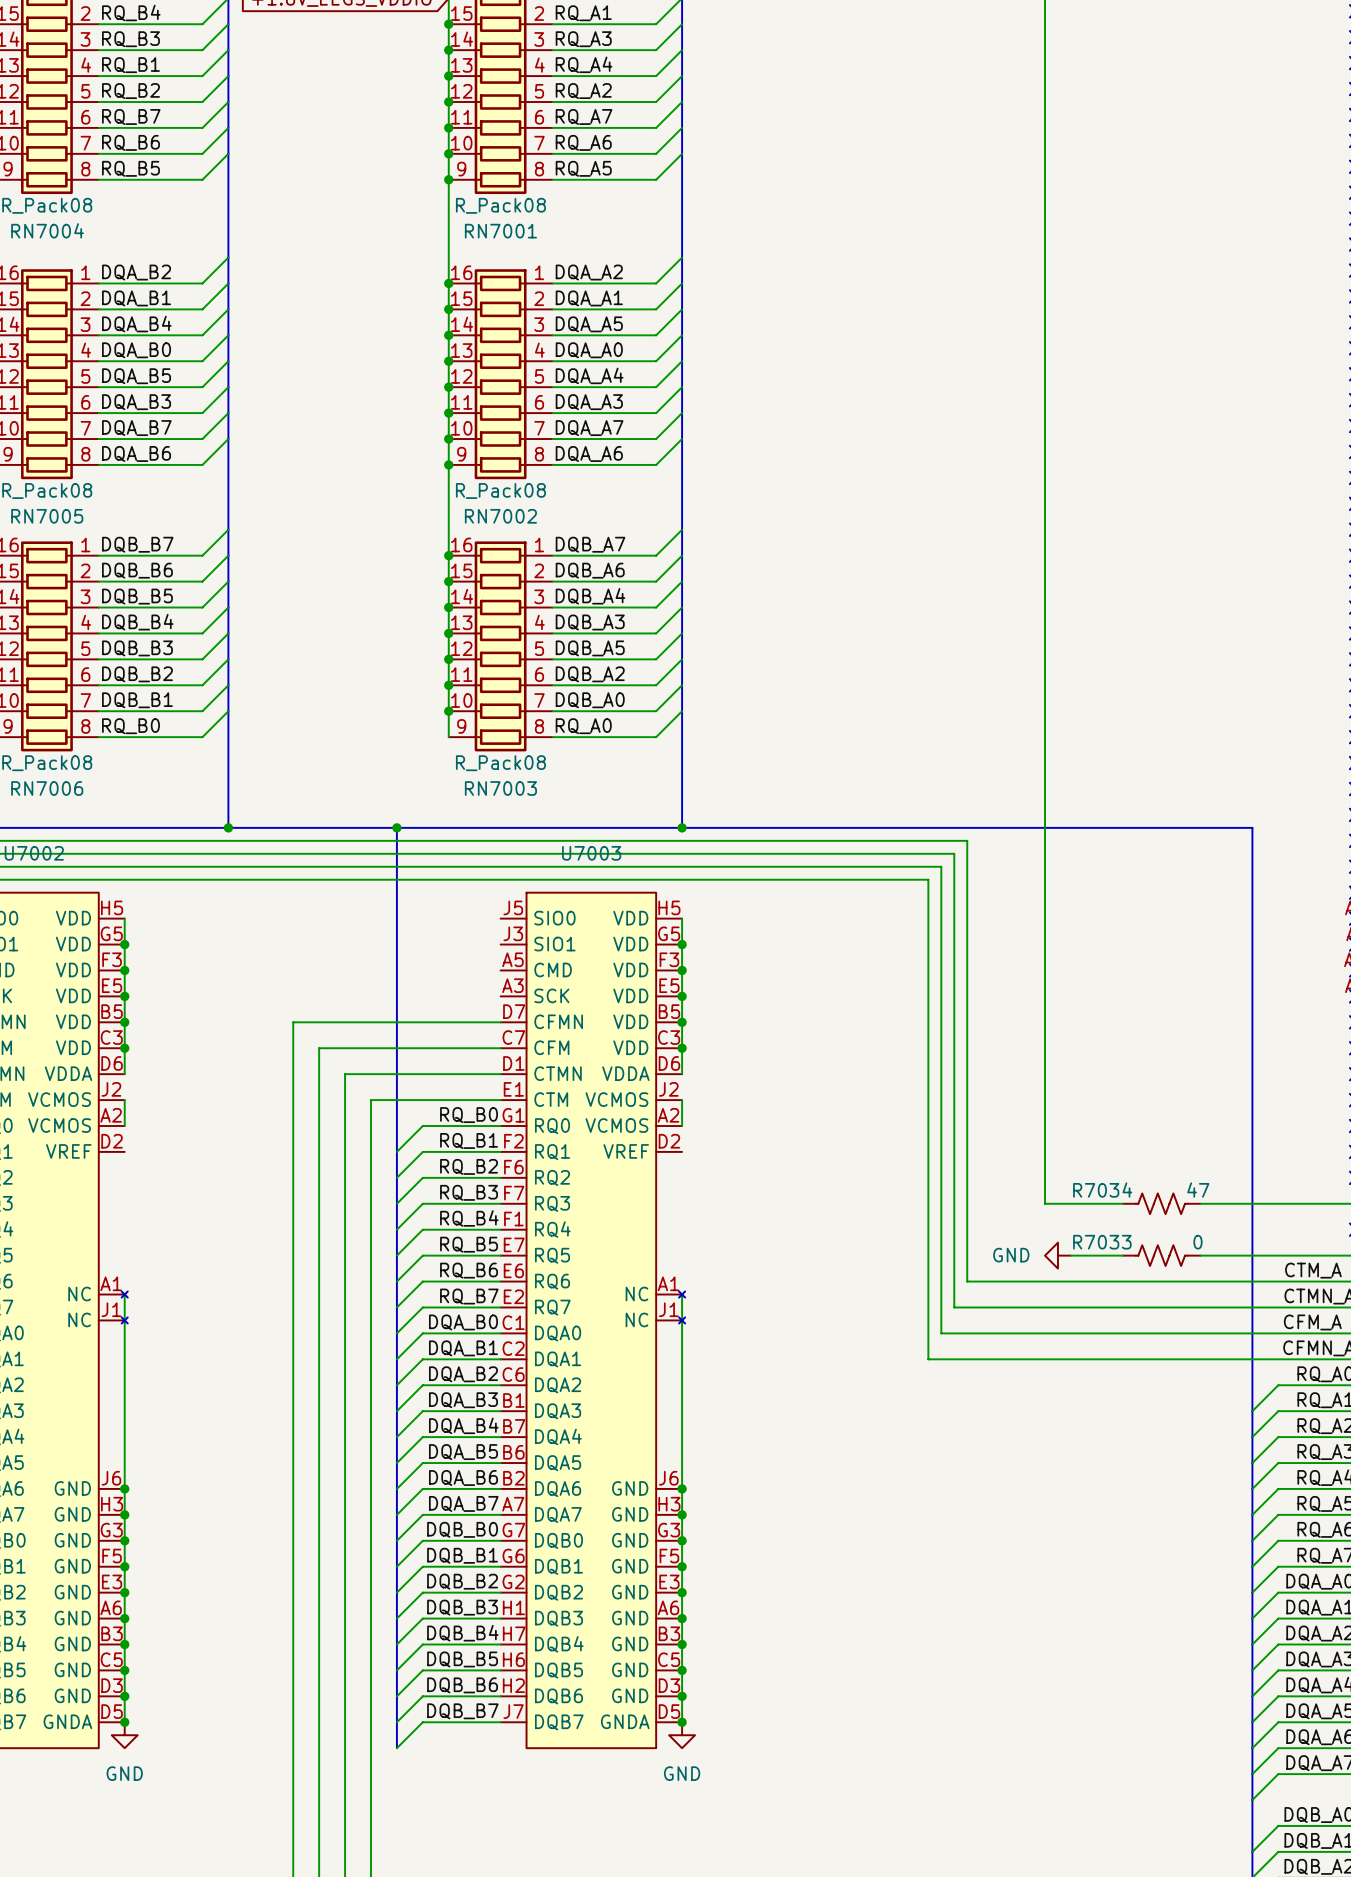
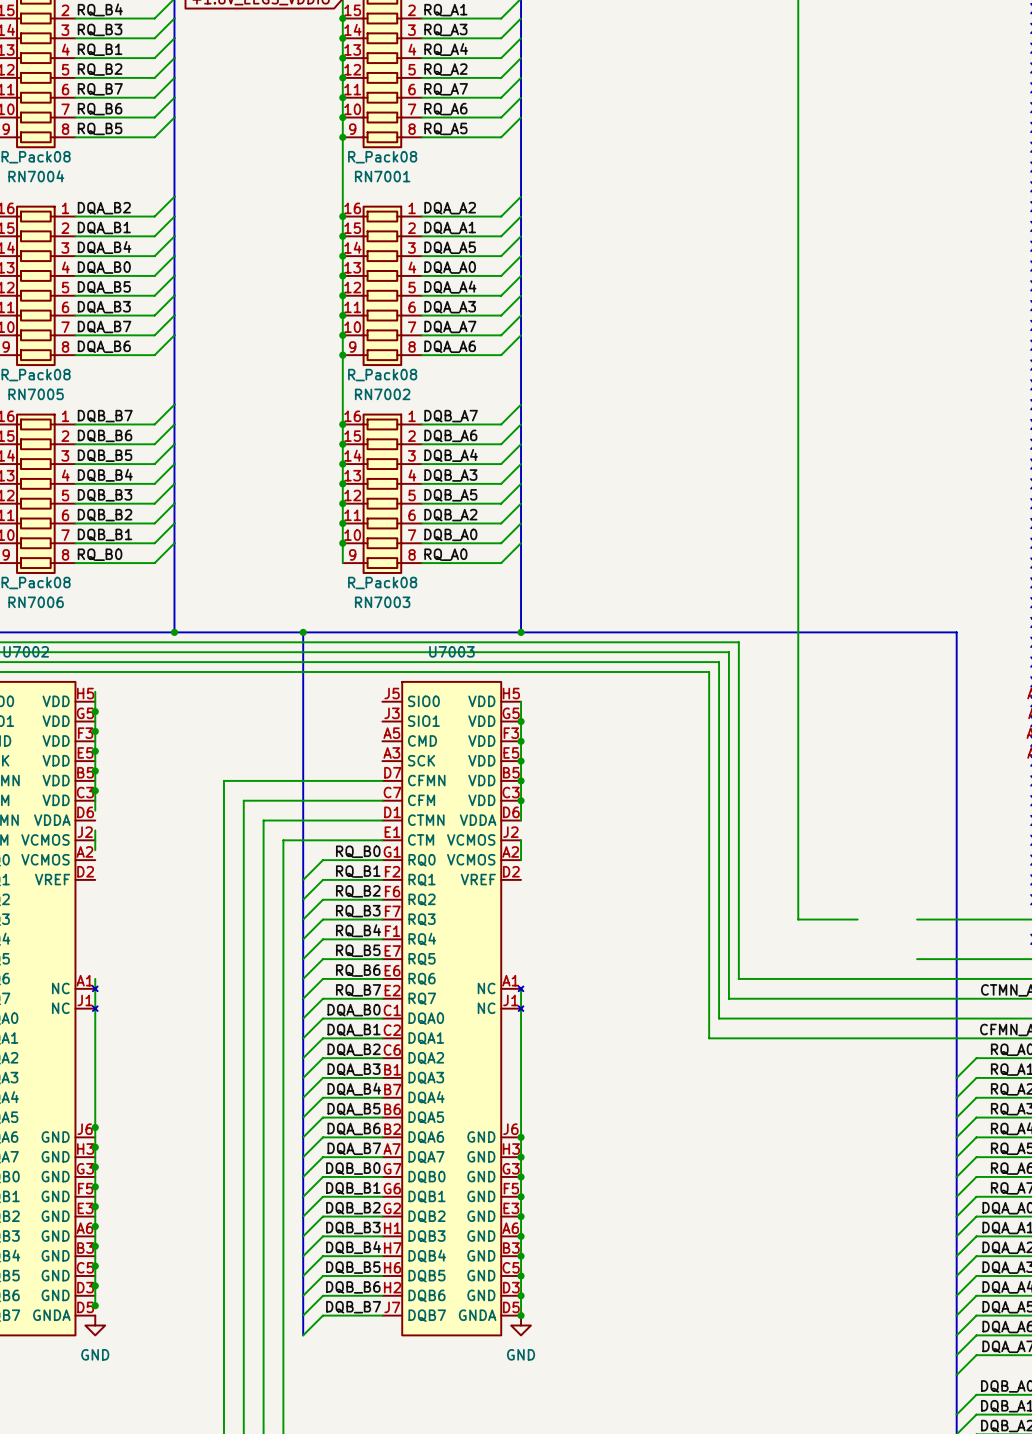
wire: none -> (95, 691) (95, 701)
junction: none -> (95, 711)
junction: (124, 944) -> none
junction: none -> (95, 731)
junction: (124, 970) -> none
junction: none -> (95, 751)
junction: (124, 996) -> none
junction: none -> (95, 771)
junction: (124, 1022) -> none
junction: none -> (95, 790)
junction: (124, 1048) -> none
wire: (124, 1061) (124, 1074) -> (95, 830) (95, 840)
wire: (124, 1113) (124, 1126) -> (95, 978) (95, 988)
R7034: 47 (1161, 1203) -> none
power symbol: GND (1057, 1255) -> none
wire: (1070, 1255) (1122, 1255) -> none
R7033: 0 (1161, 1255) -> none
label: CTM_A (1313, 1270) -> none
label: CFM_A (1312, 1322) -> none
junction: none -> (95, 1127)
junction: (124, 1488) -> none
junction: none -> (95, 1147)
junction: (124, 1514) -> none
junction: none -> (95, 1167)
junction: (124, 1540) -> none
junction: none -> (95, 1186)
junction: (124, 1566) -> none
junction: none -> (95, 1206)
junction: (124, 1592) -> none
junction: none -> (95, 1226)
junction: (124, 1618) -> none
junction: none -> (95, 1246)
junction: (124, 1644) -> none
junction: none -> (95, 1266)
junction: (124, 1670) -> none
junction: none -> (95, 1285)
junction: (124, 1696) -> none
junction: none -> (95, 1305)
junction: (124, 1722) -> none

